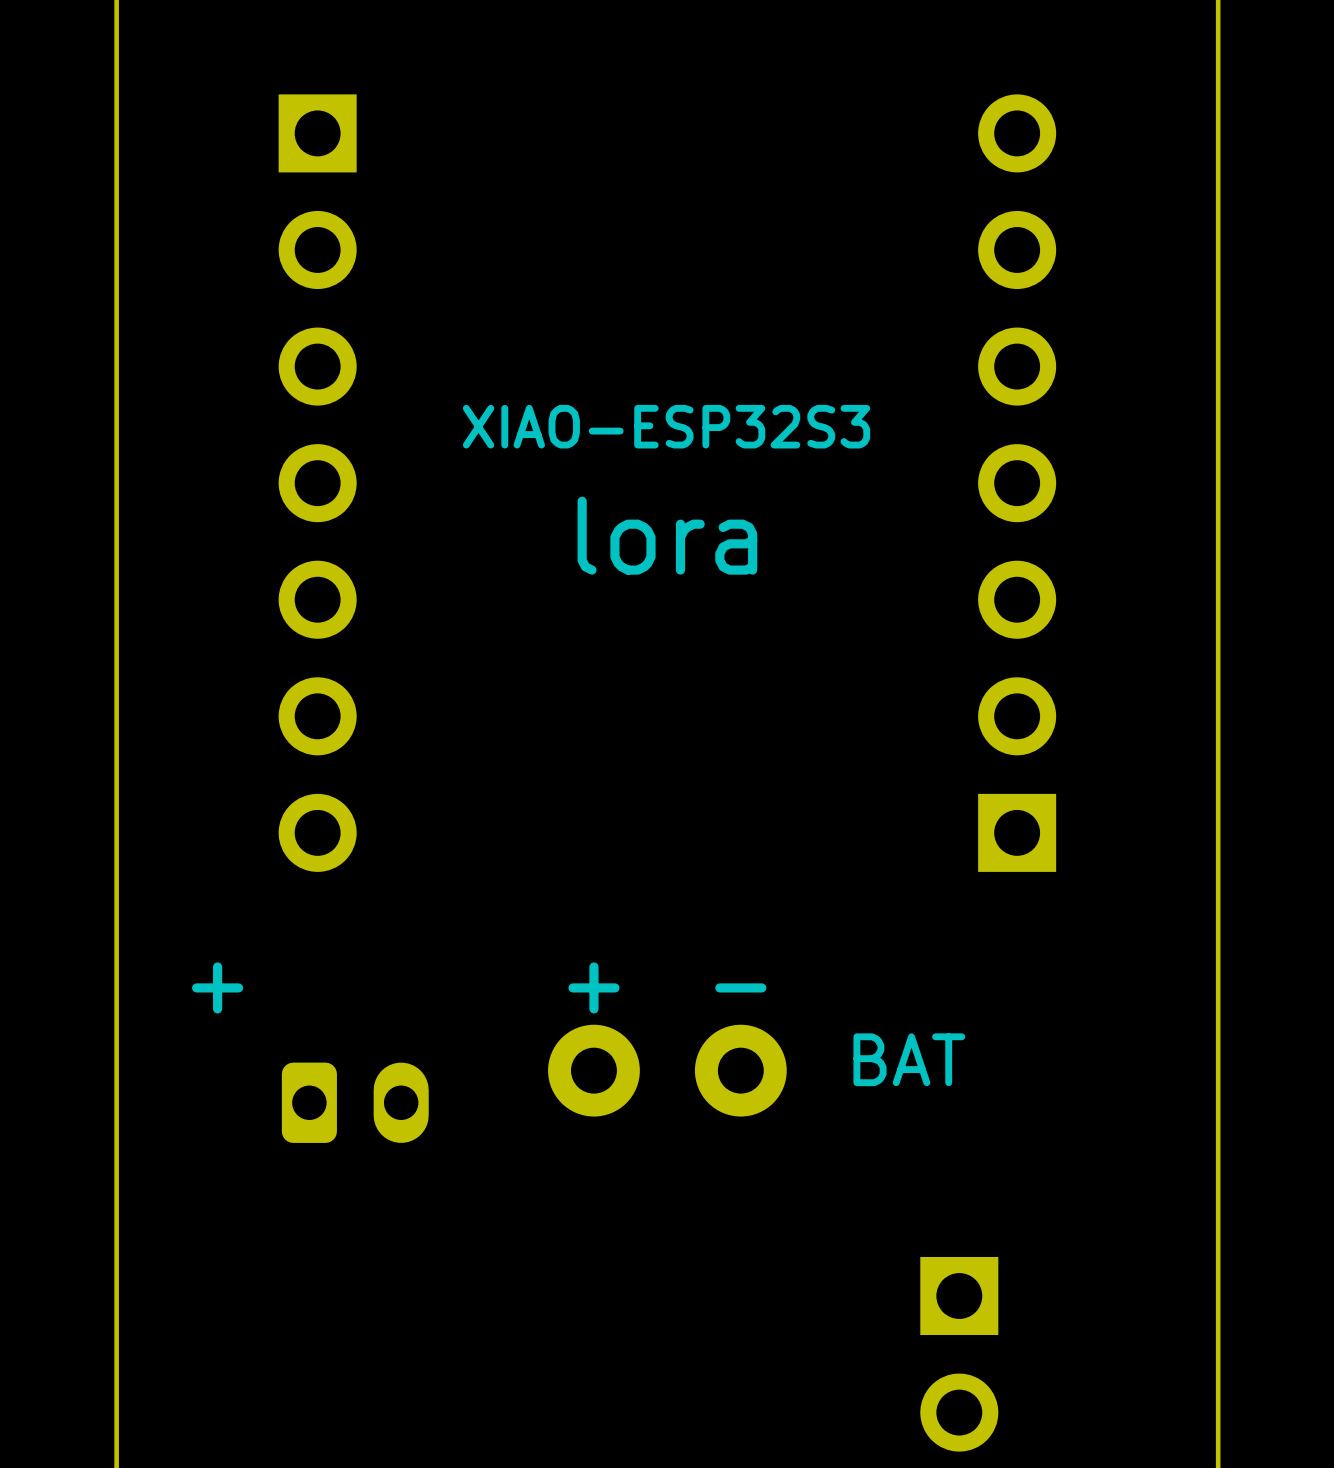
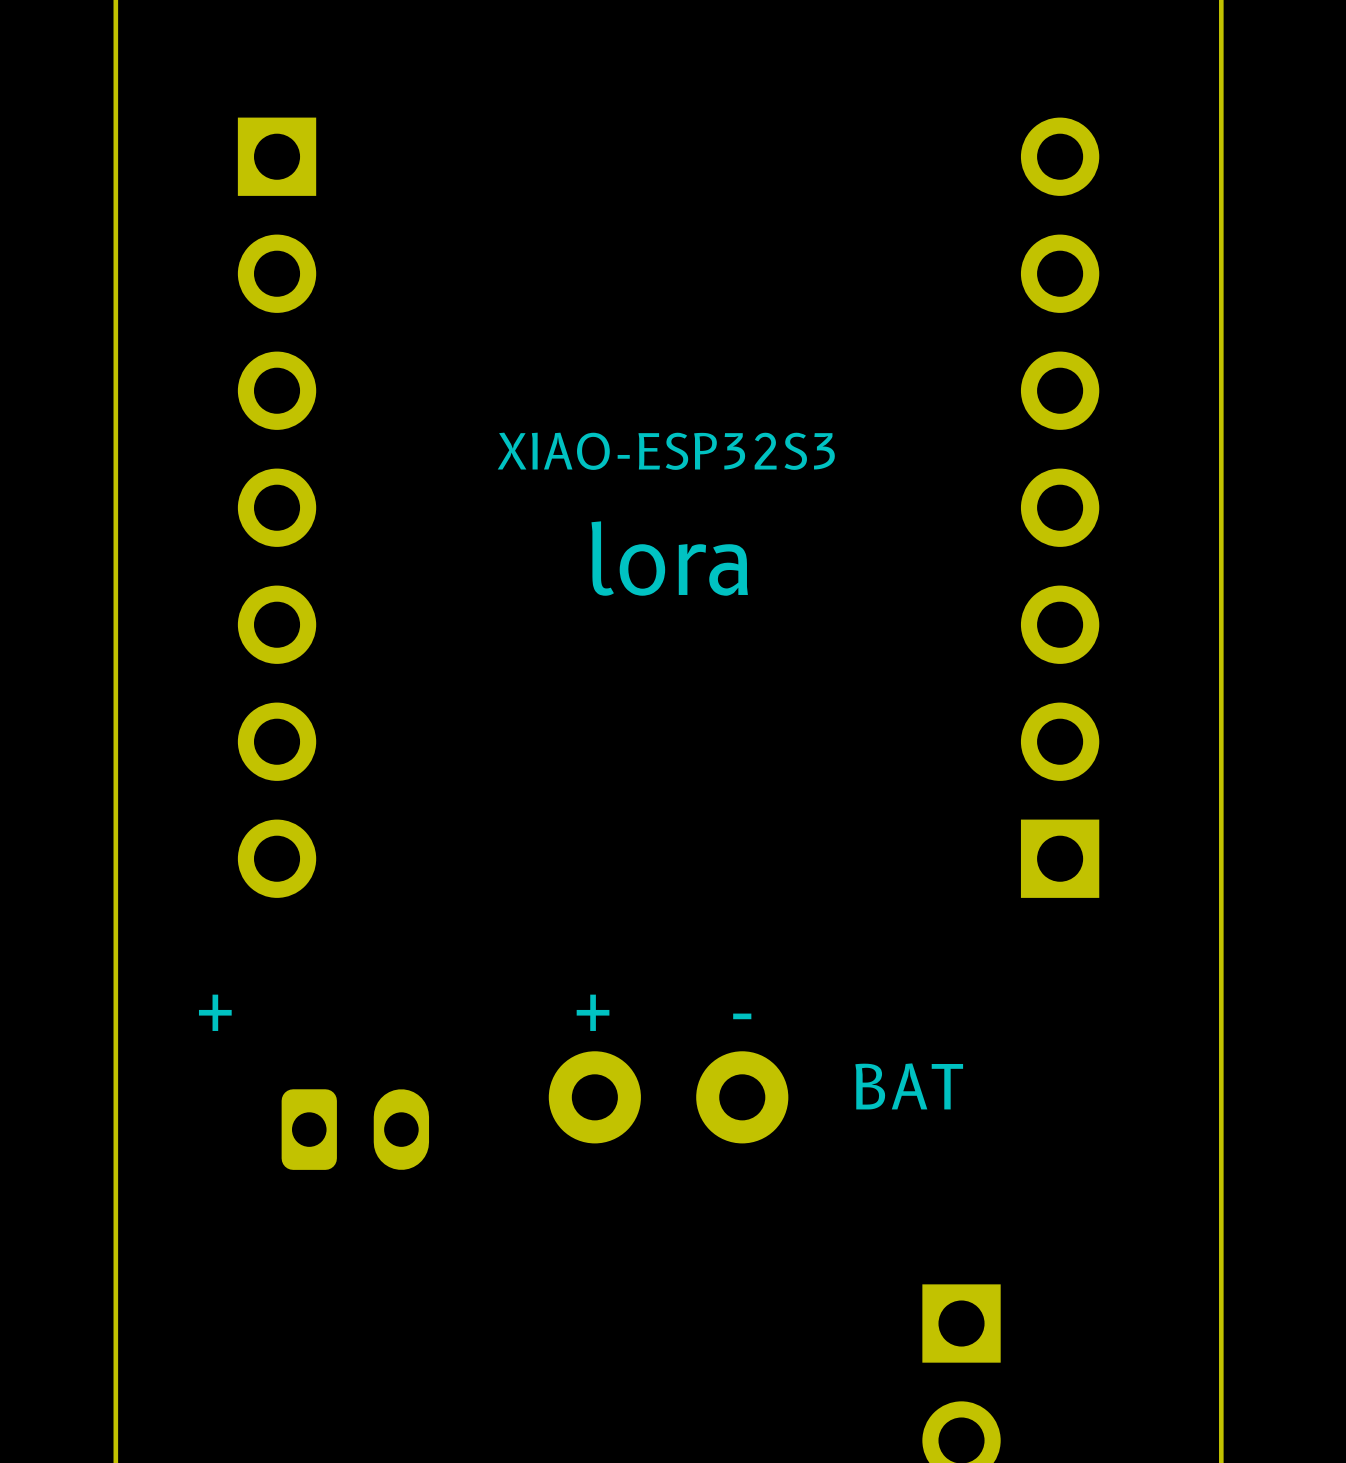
part position: (317, 483) -> (277, 507)
part position: (1017, 483) -> (1060, 507)

